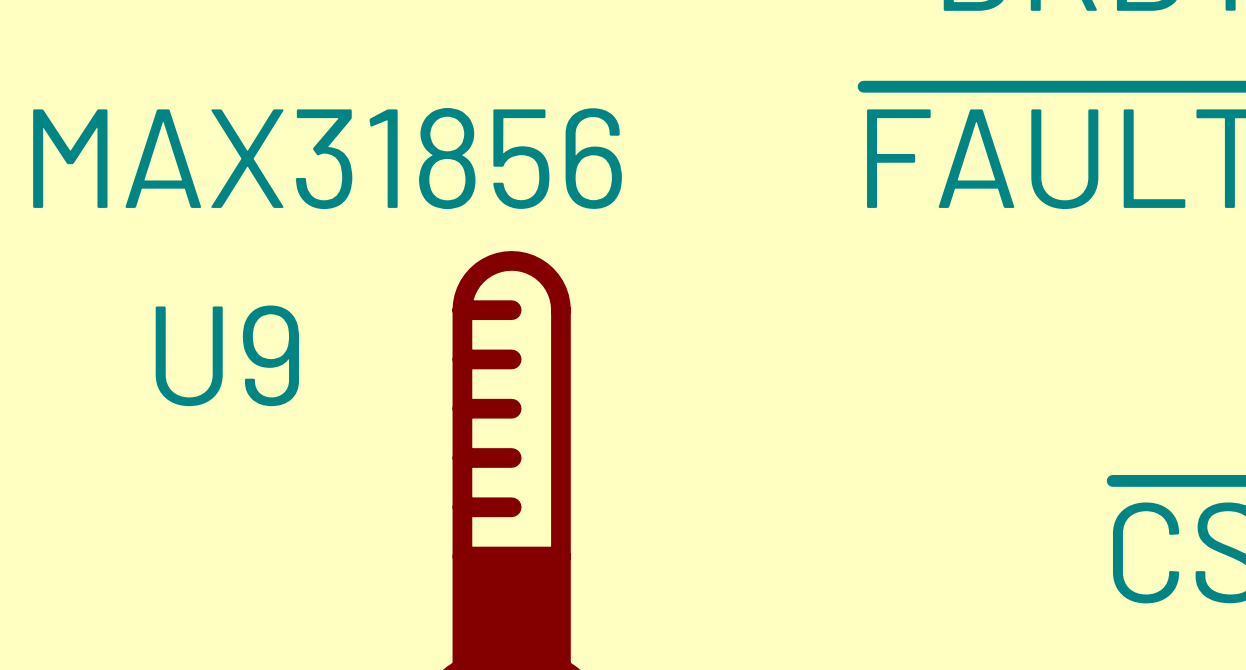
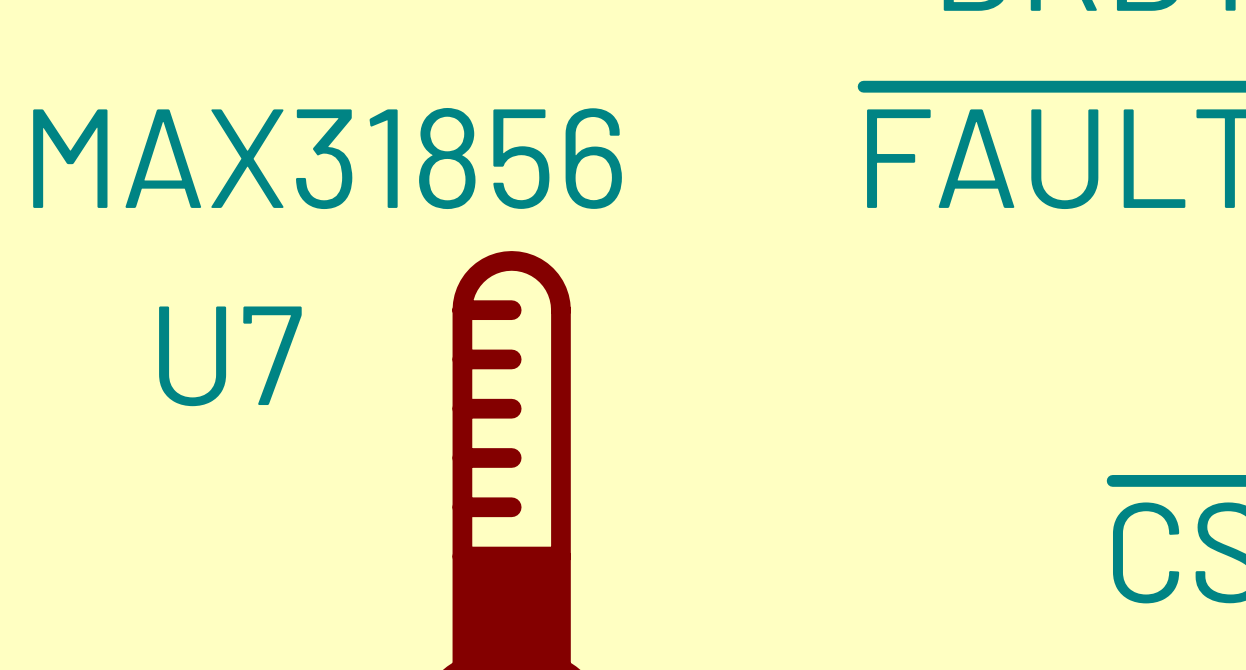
U9 name: U9 (227, 355) -> U7 (230, 356)

